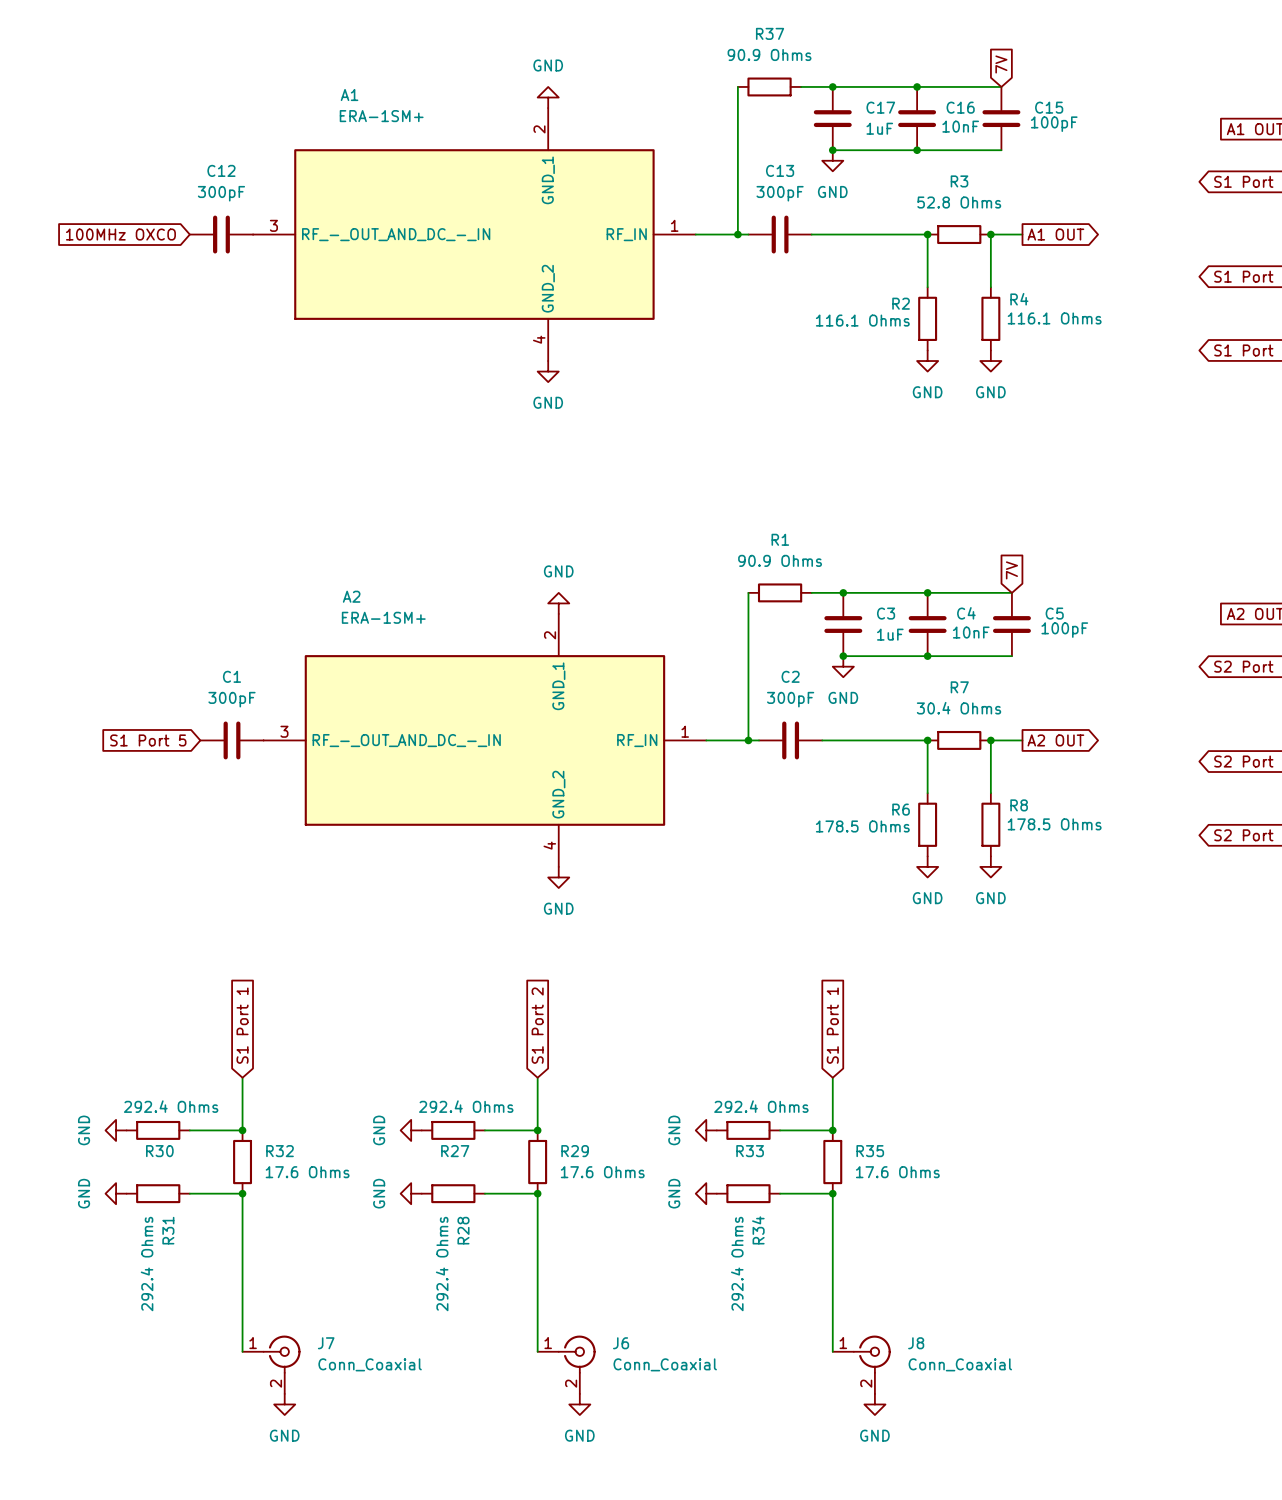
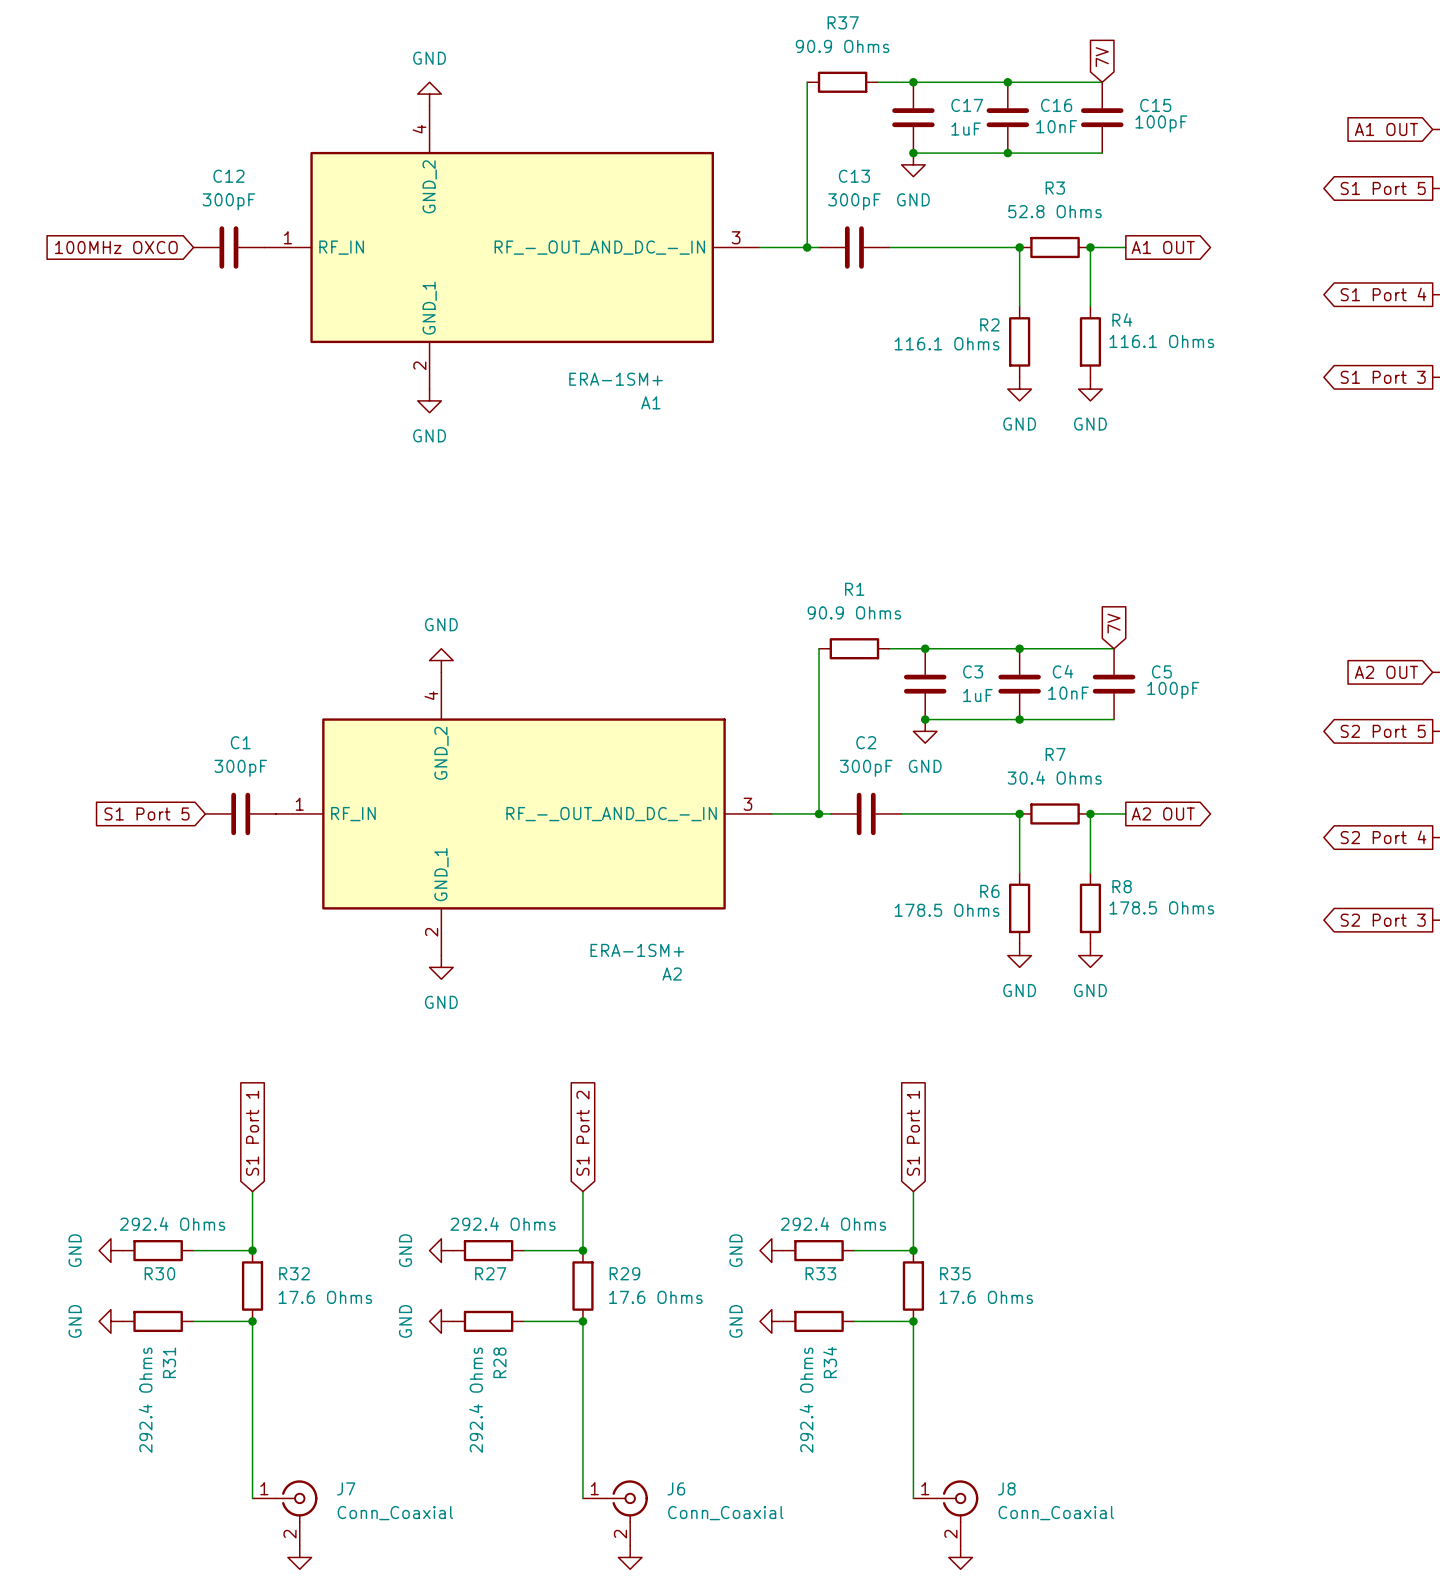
power symbol position: GND (548, 97) -> GND (429, 94)
A1 rotation: 0° (474, 234) -> 180° (512, 247)
power symbol: none -> GND (429, 400)
power symbol: GND (548, 371) -> none
power symbol: none -> GND (441, 660)
power symbol: GND (558, 603) -> none
A2 rotation: 0° (484, 740) -> 180° (523, 813)
power symbol position: GND (558, 877) -> GND (441, 967)

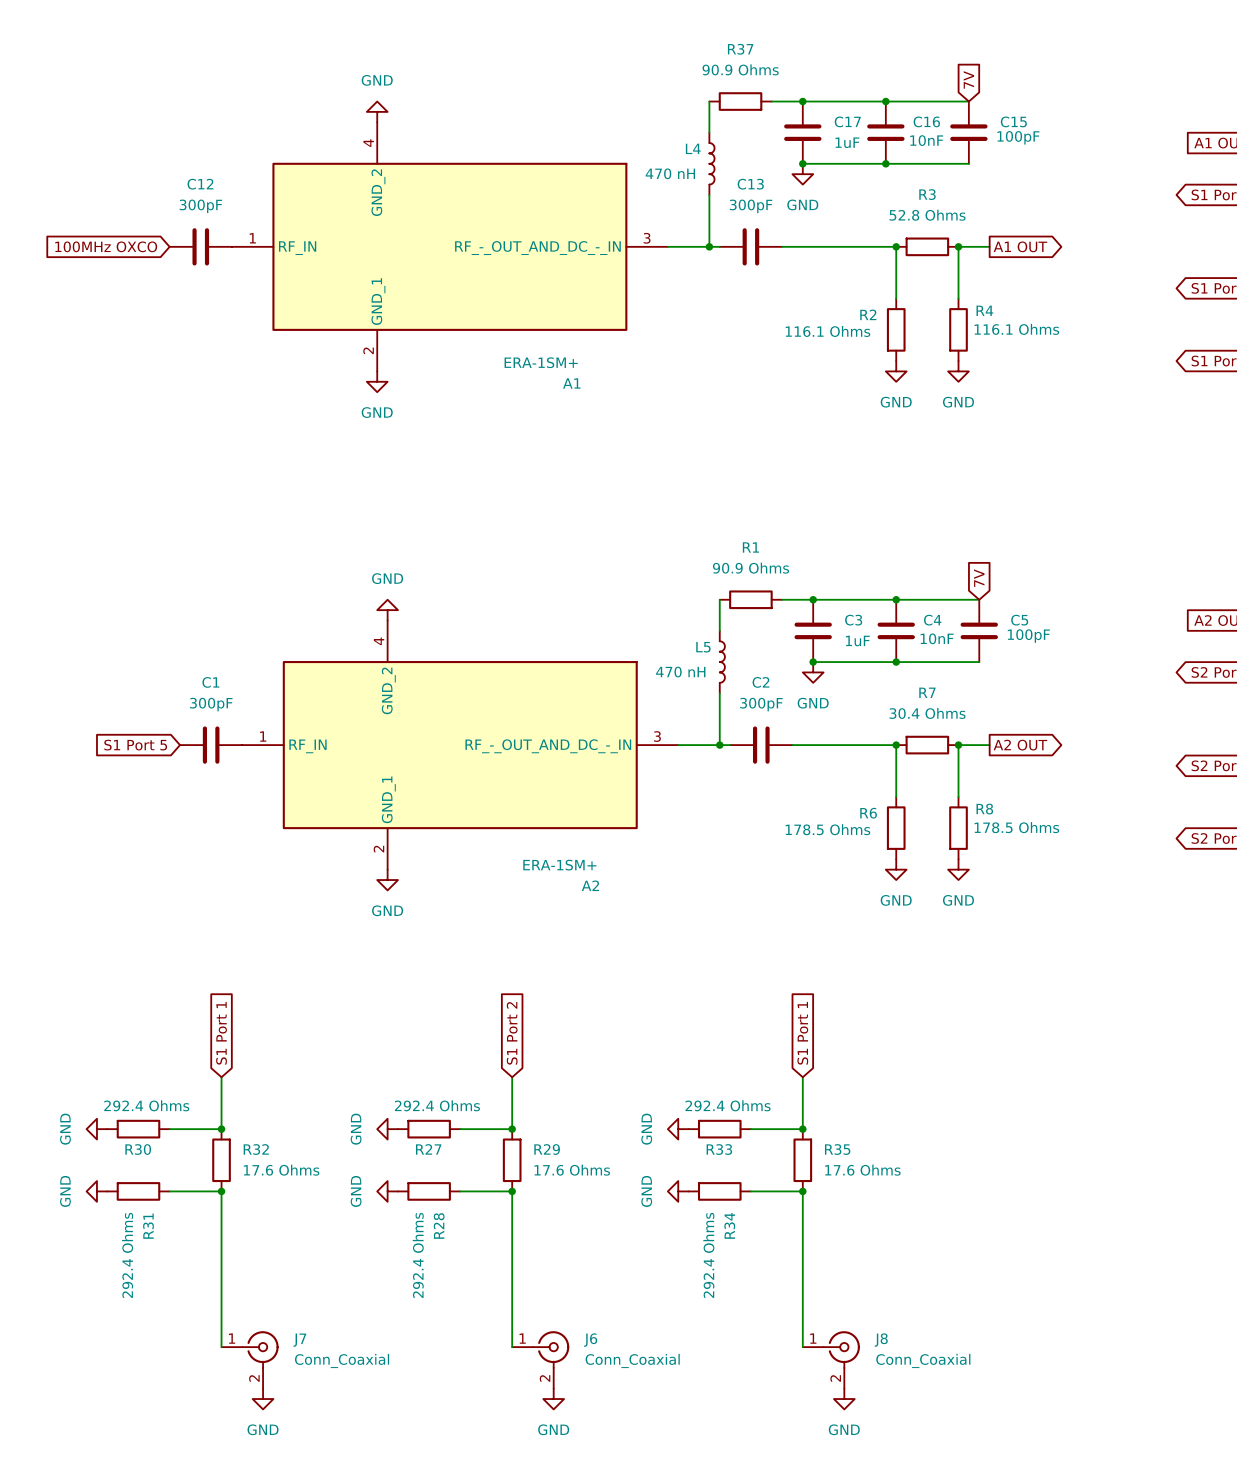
wire: (807, 117) (807, 188) -> none
L4: none -> 470 nH (711, 163)
wire: (819, 684) (819, 754) -> none
L5: none -> 470 nH (722, 662)

